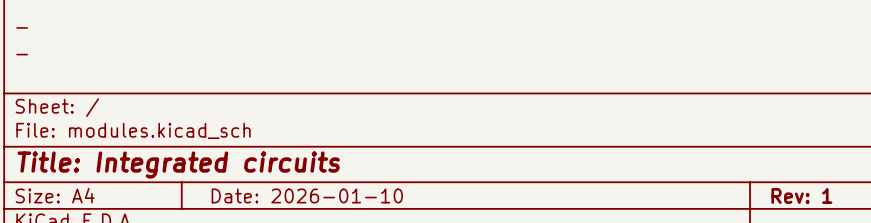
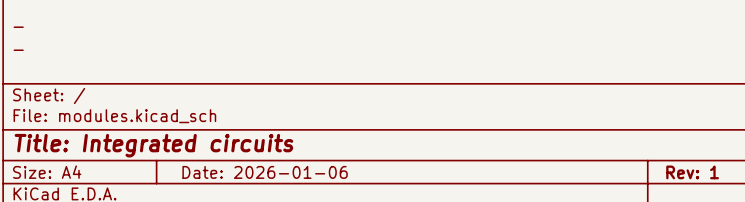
title block: Date: 2026-01-10 (307, 195) -> Date: 2026-01-06 (265, 172)

